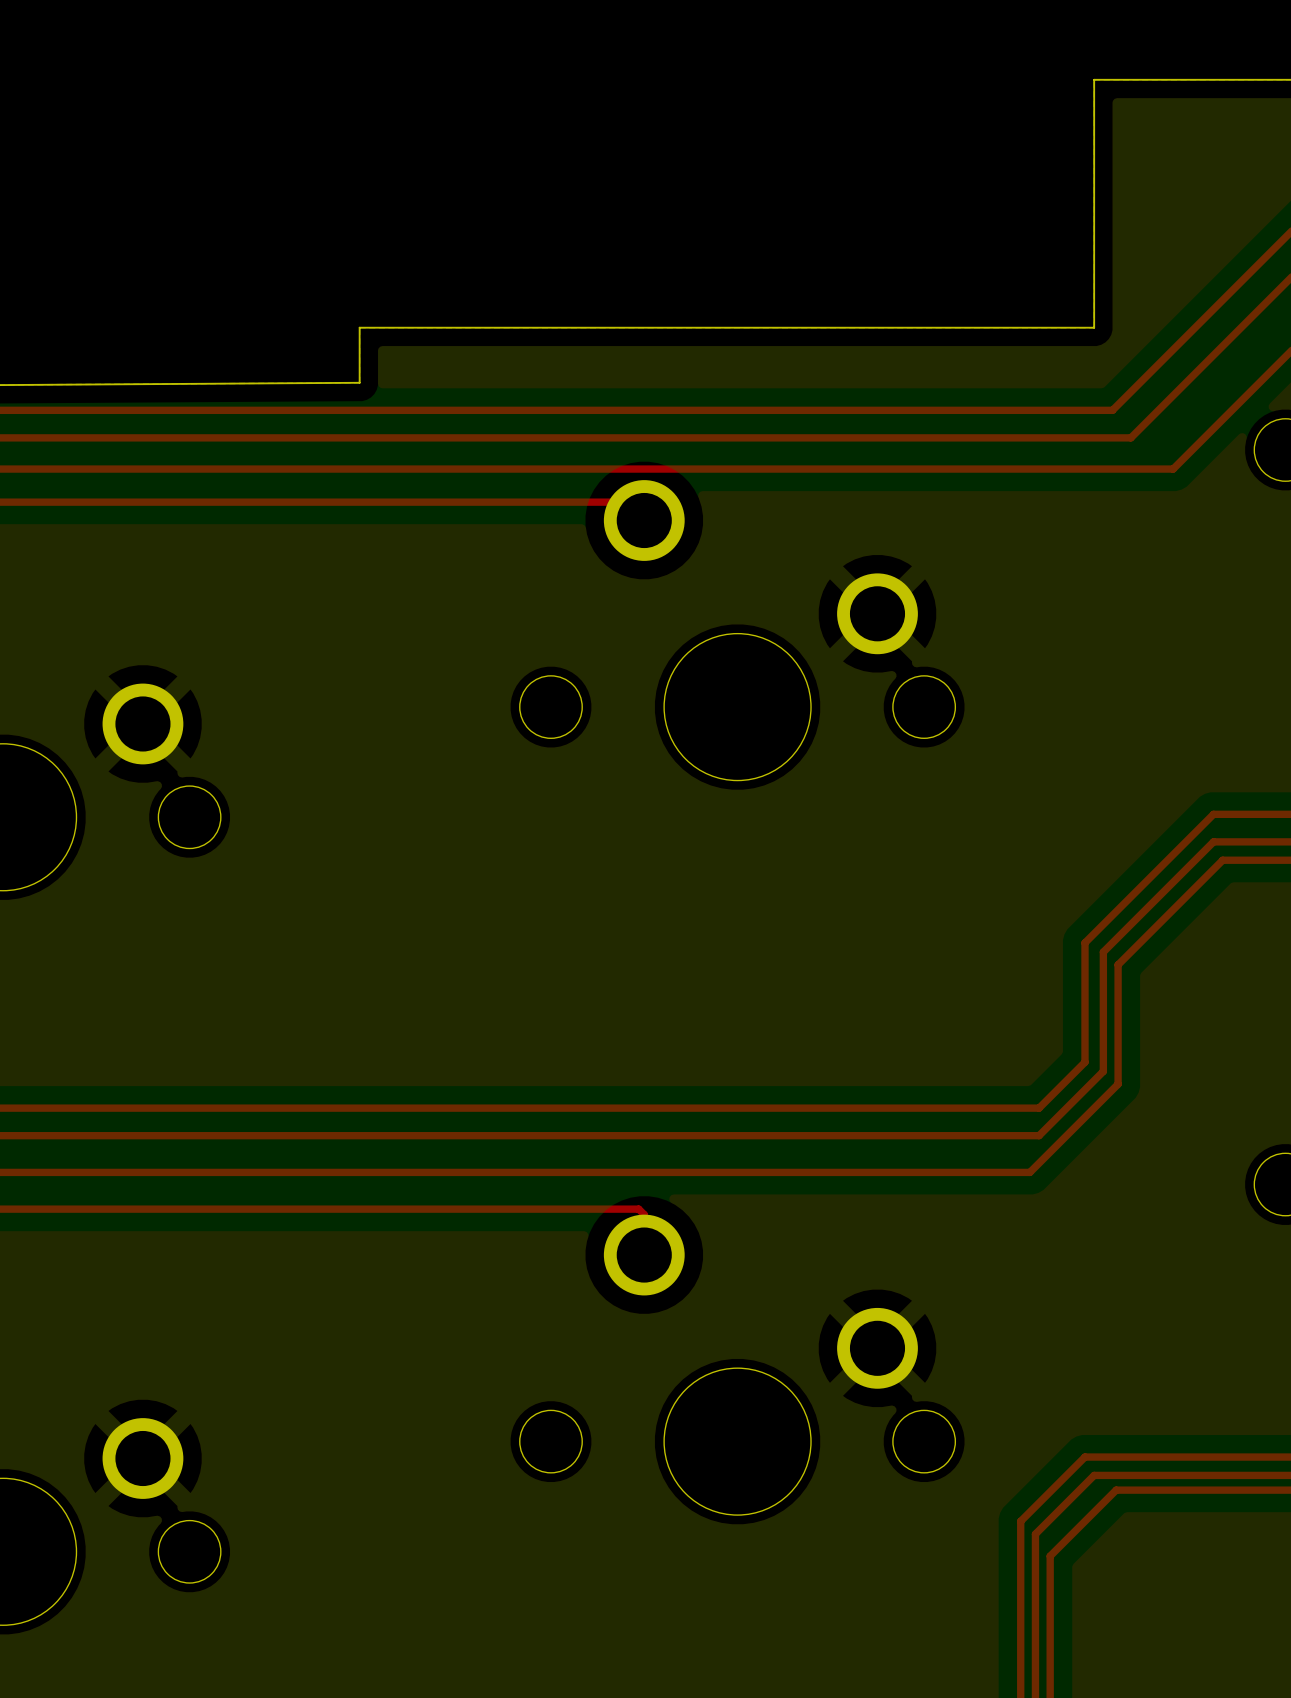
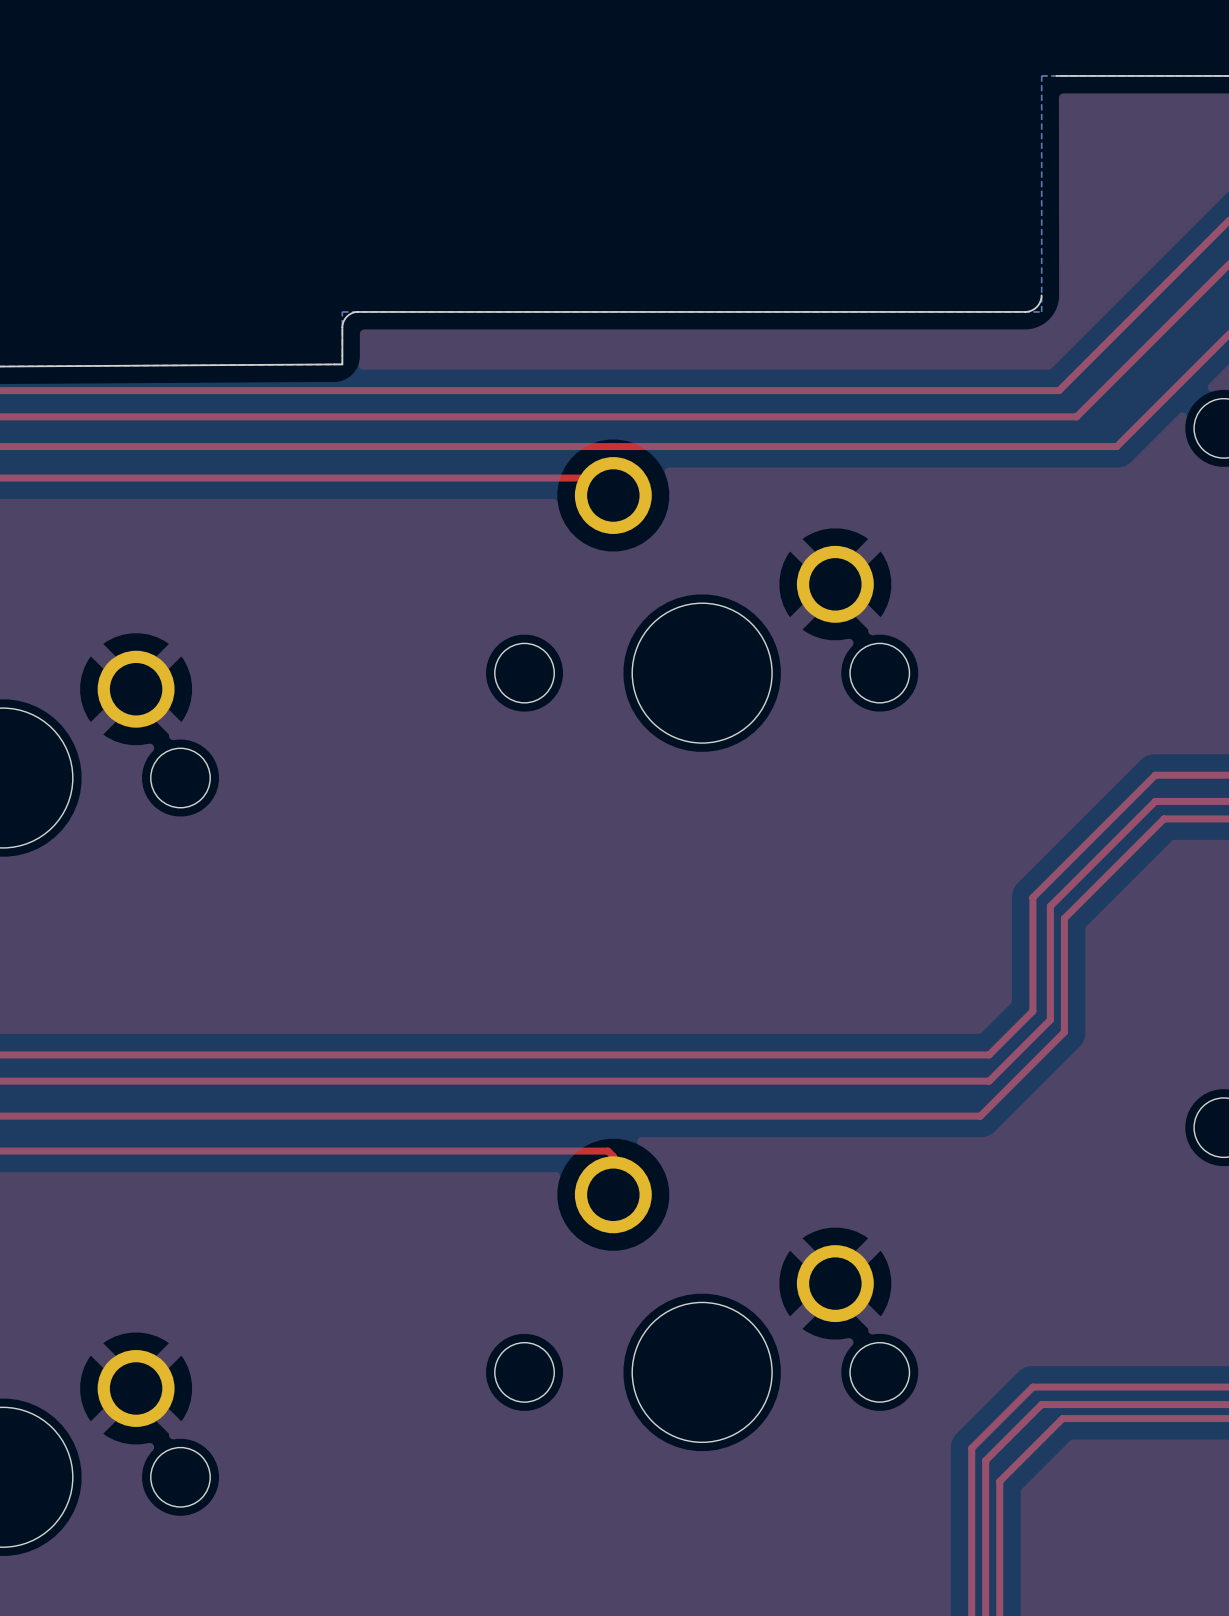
board edge: (1109, 79) (1094, 79) (1094, 327) (359, 327) (359, 343) -> (1041, 295) (1036, 307) (1025, 311) (356, 312) (347, 316) (342, 327)

